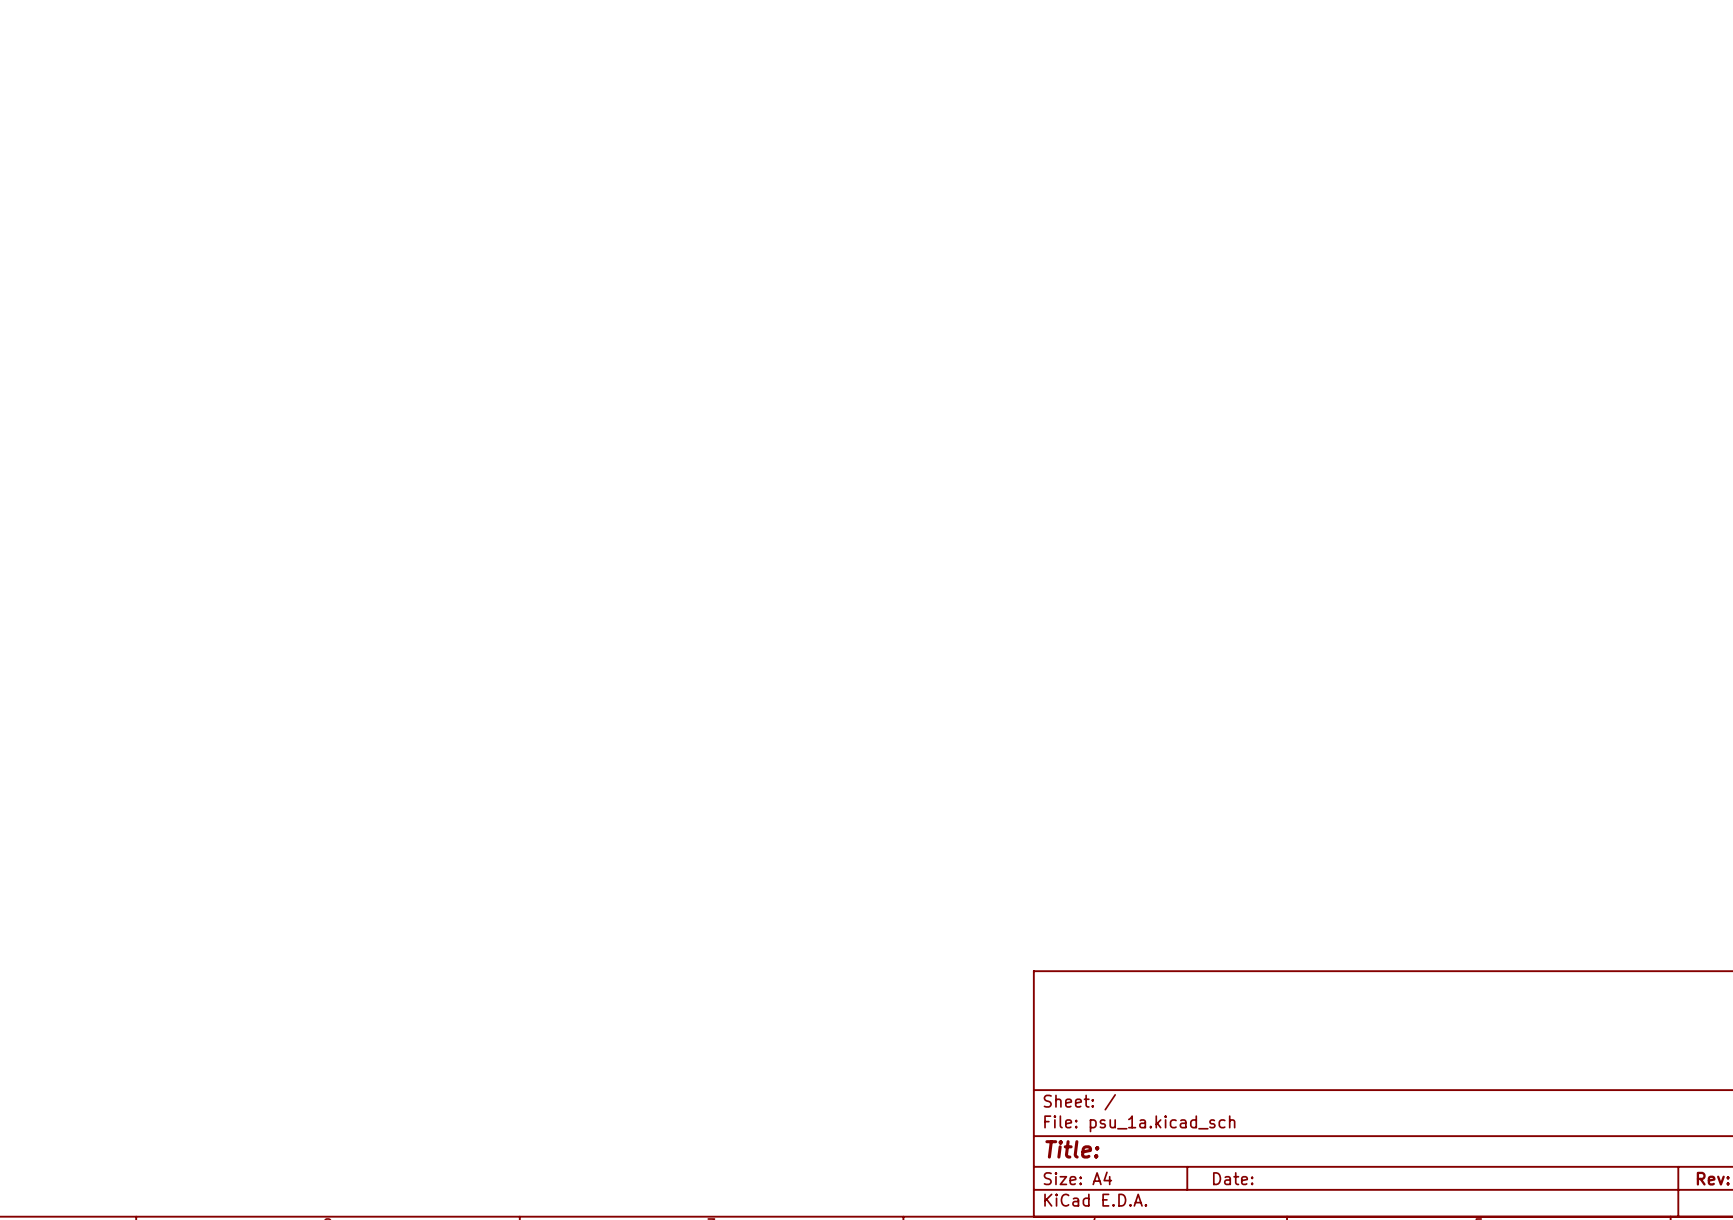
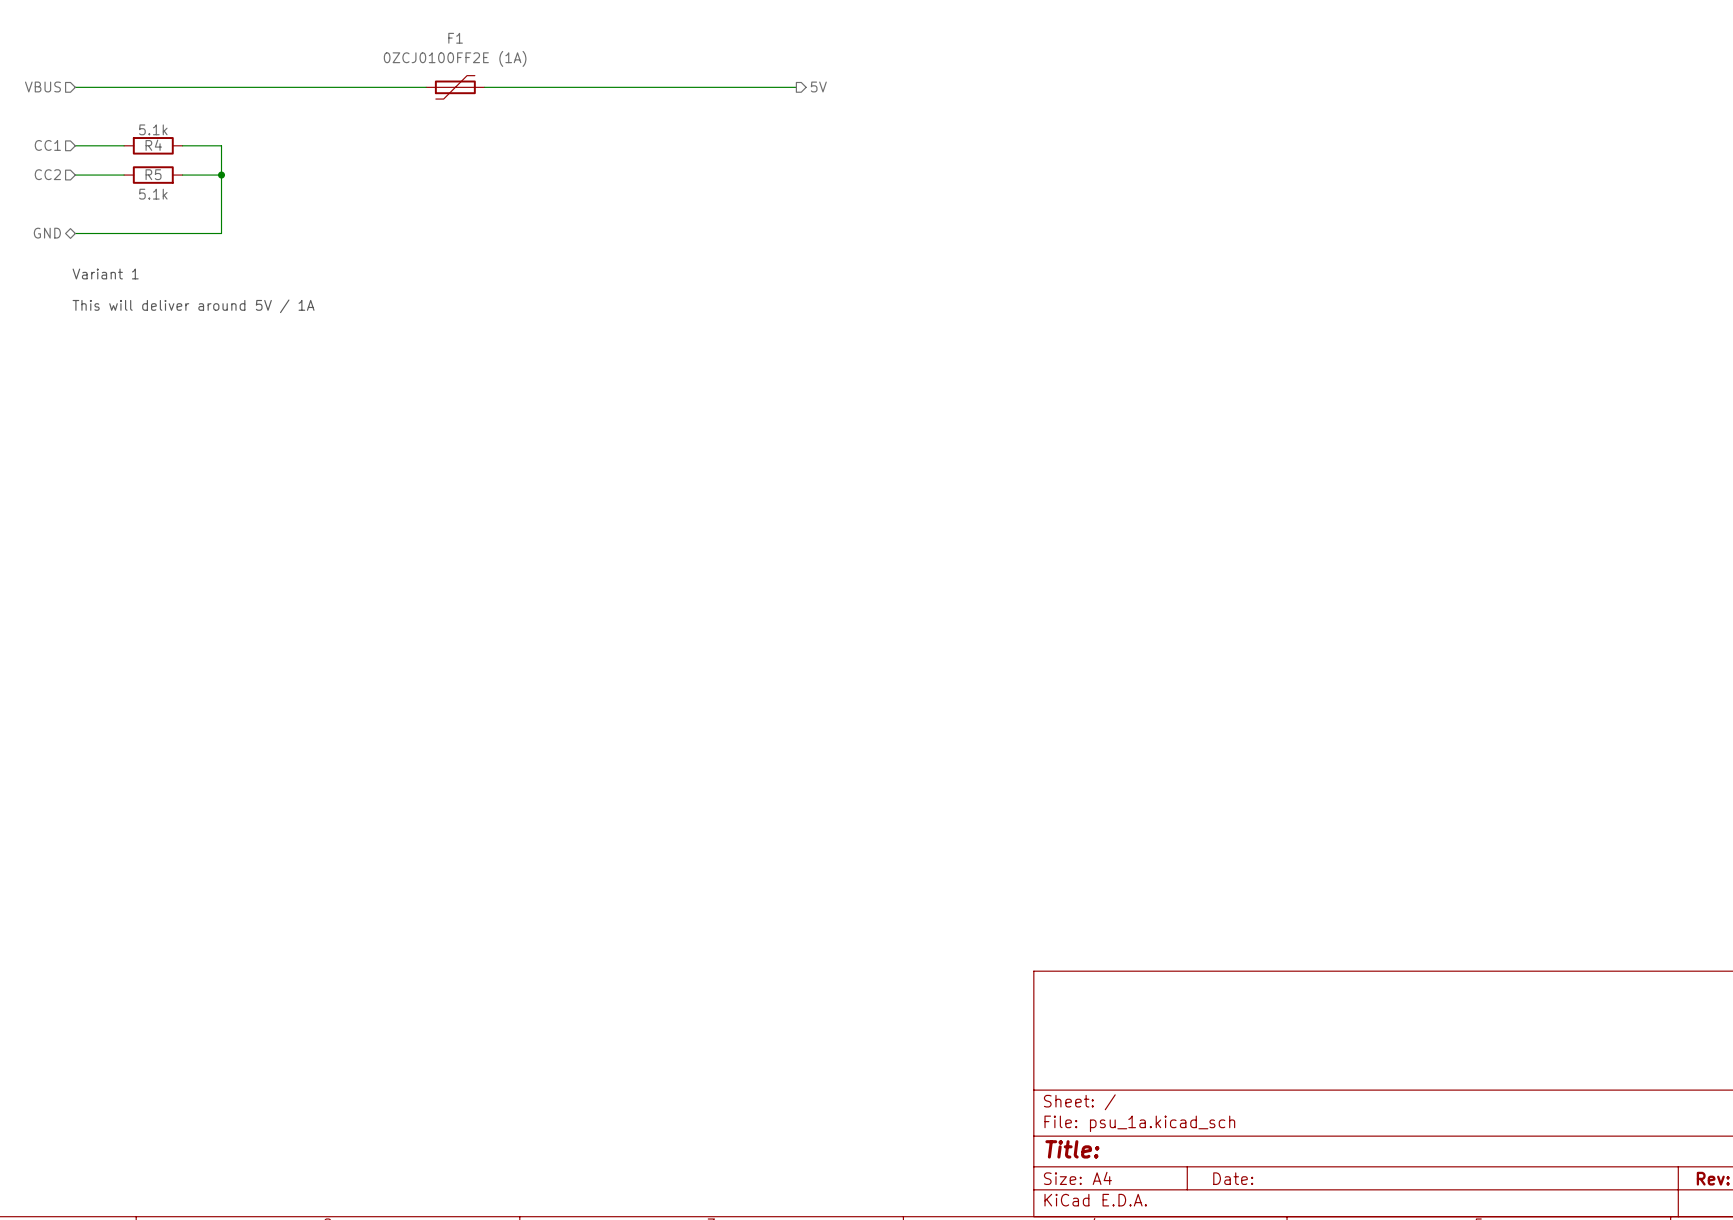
hierarchical label: none -> VBUS (42, 86)
hierarchical label: none -> 5V (818, 86)
wire: none -> (75, 87) (426, 87)
F1: none -> 0ZCJ0100FF2E (1A) (455, 87)
wire: none -> (484, 87) (796, 87)
hierarchical label: none -> CC1 (47, 145)
wire: none -> (75, 145) (124, 145)
R4: none -> 5.1k (153, 145)
wire: none -> (182, 145) (221, 145) (221, 233) (75, 233)
hierarchical label: none -> CC2 (47, 174)
wire: none -> (75, 175) (124, 175)
R5: none -> 5.1k (153, 175)
wire: none -> (182, 175) (221, 175)
junction: none -> (221, 175)
hierarchical label: none -> GND (47, 233)
text: none -> Variant 1 (105, 273)
text: none -> This will deliver around 5V / 1A (193, 306)

